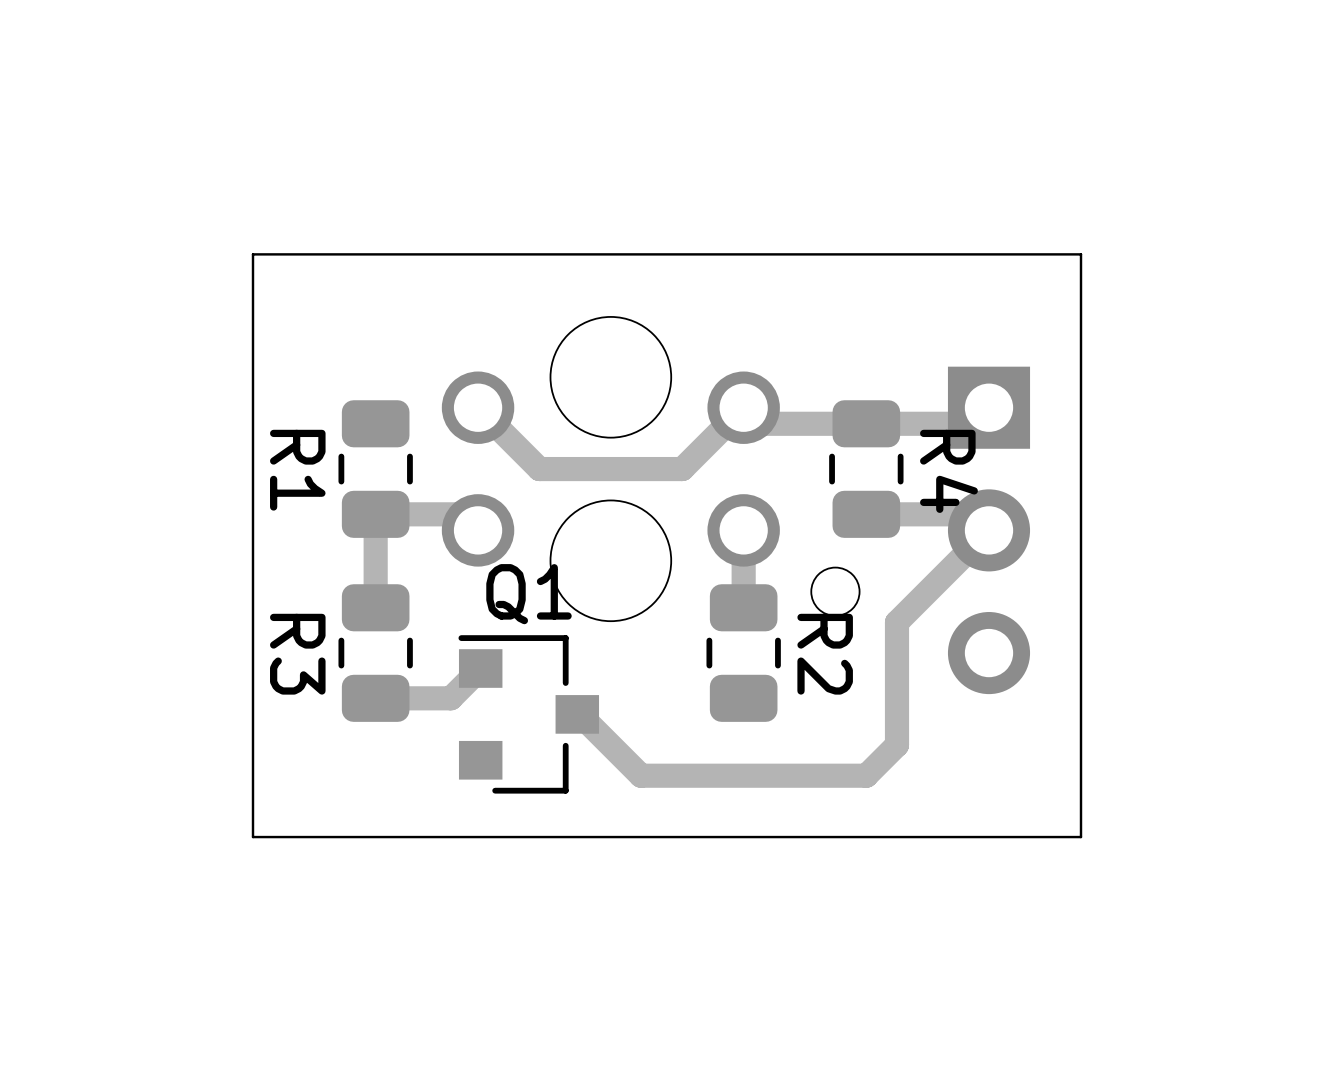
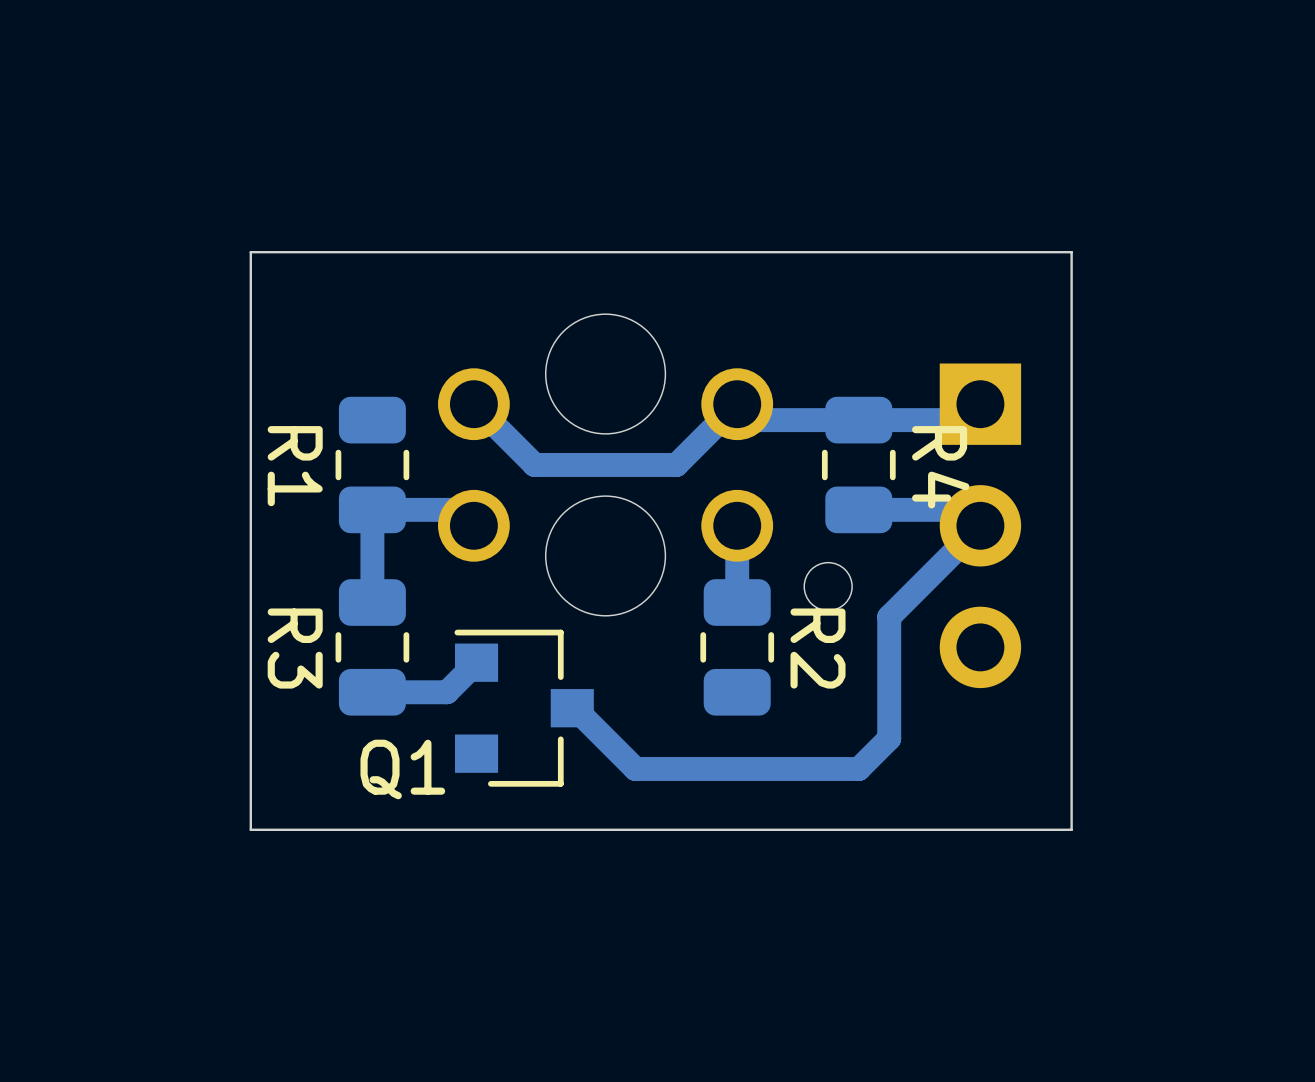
Q1 name position: Q1 (529, 594) -> Q1 (402, 769)

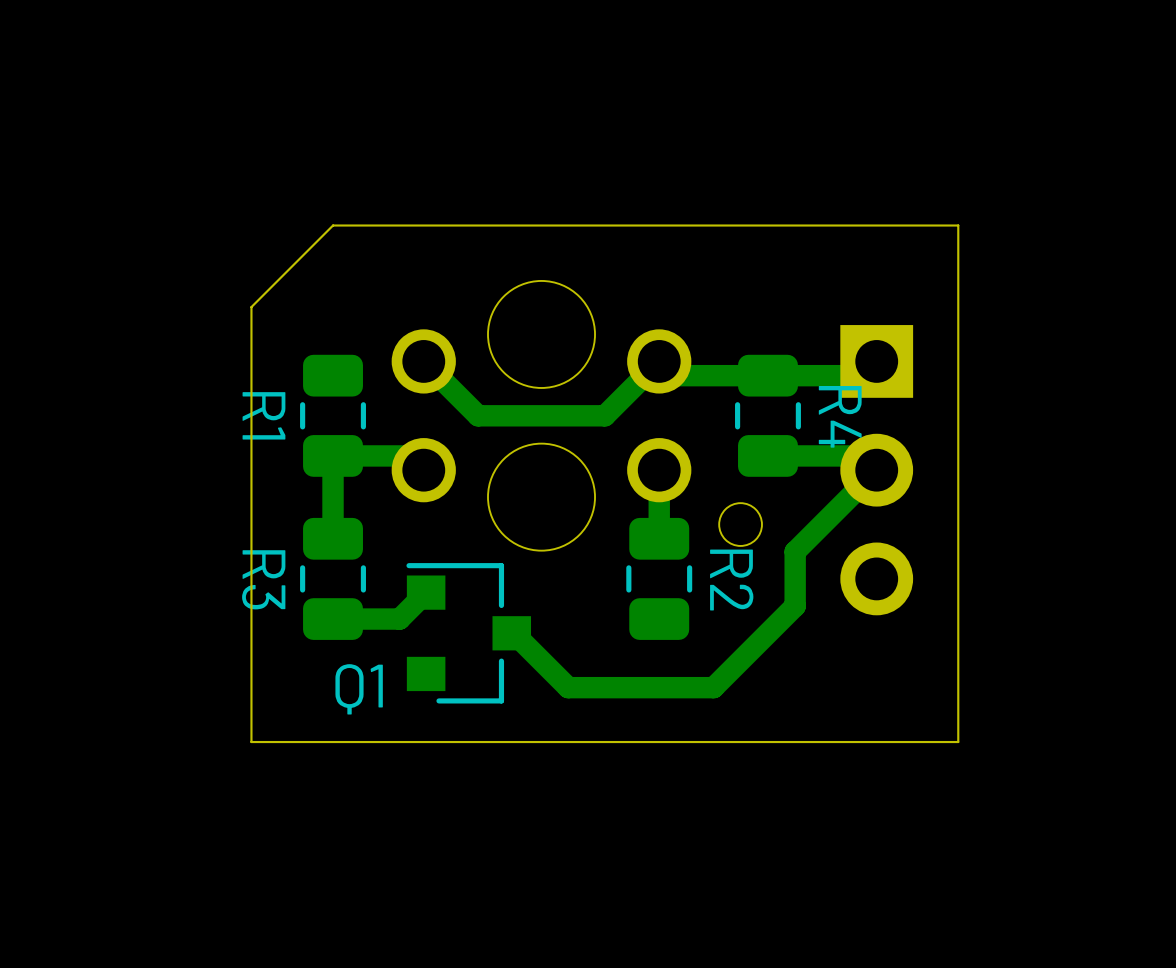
board edge: (372, 252) (250, 252) (250, 829) (281, 829) -> (333, 225) (251, 307) (251, 742)
track: (889, 677) (889, 738) (858, 769) (798, 769) -> (795, 606) (713, 687)

